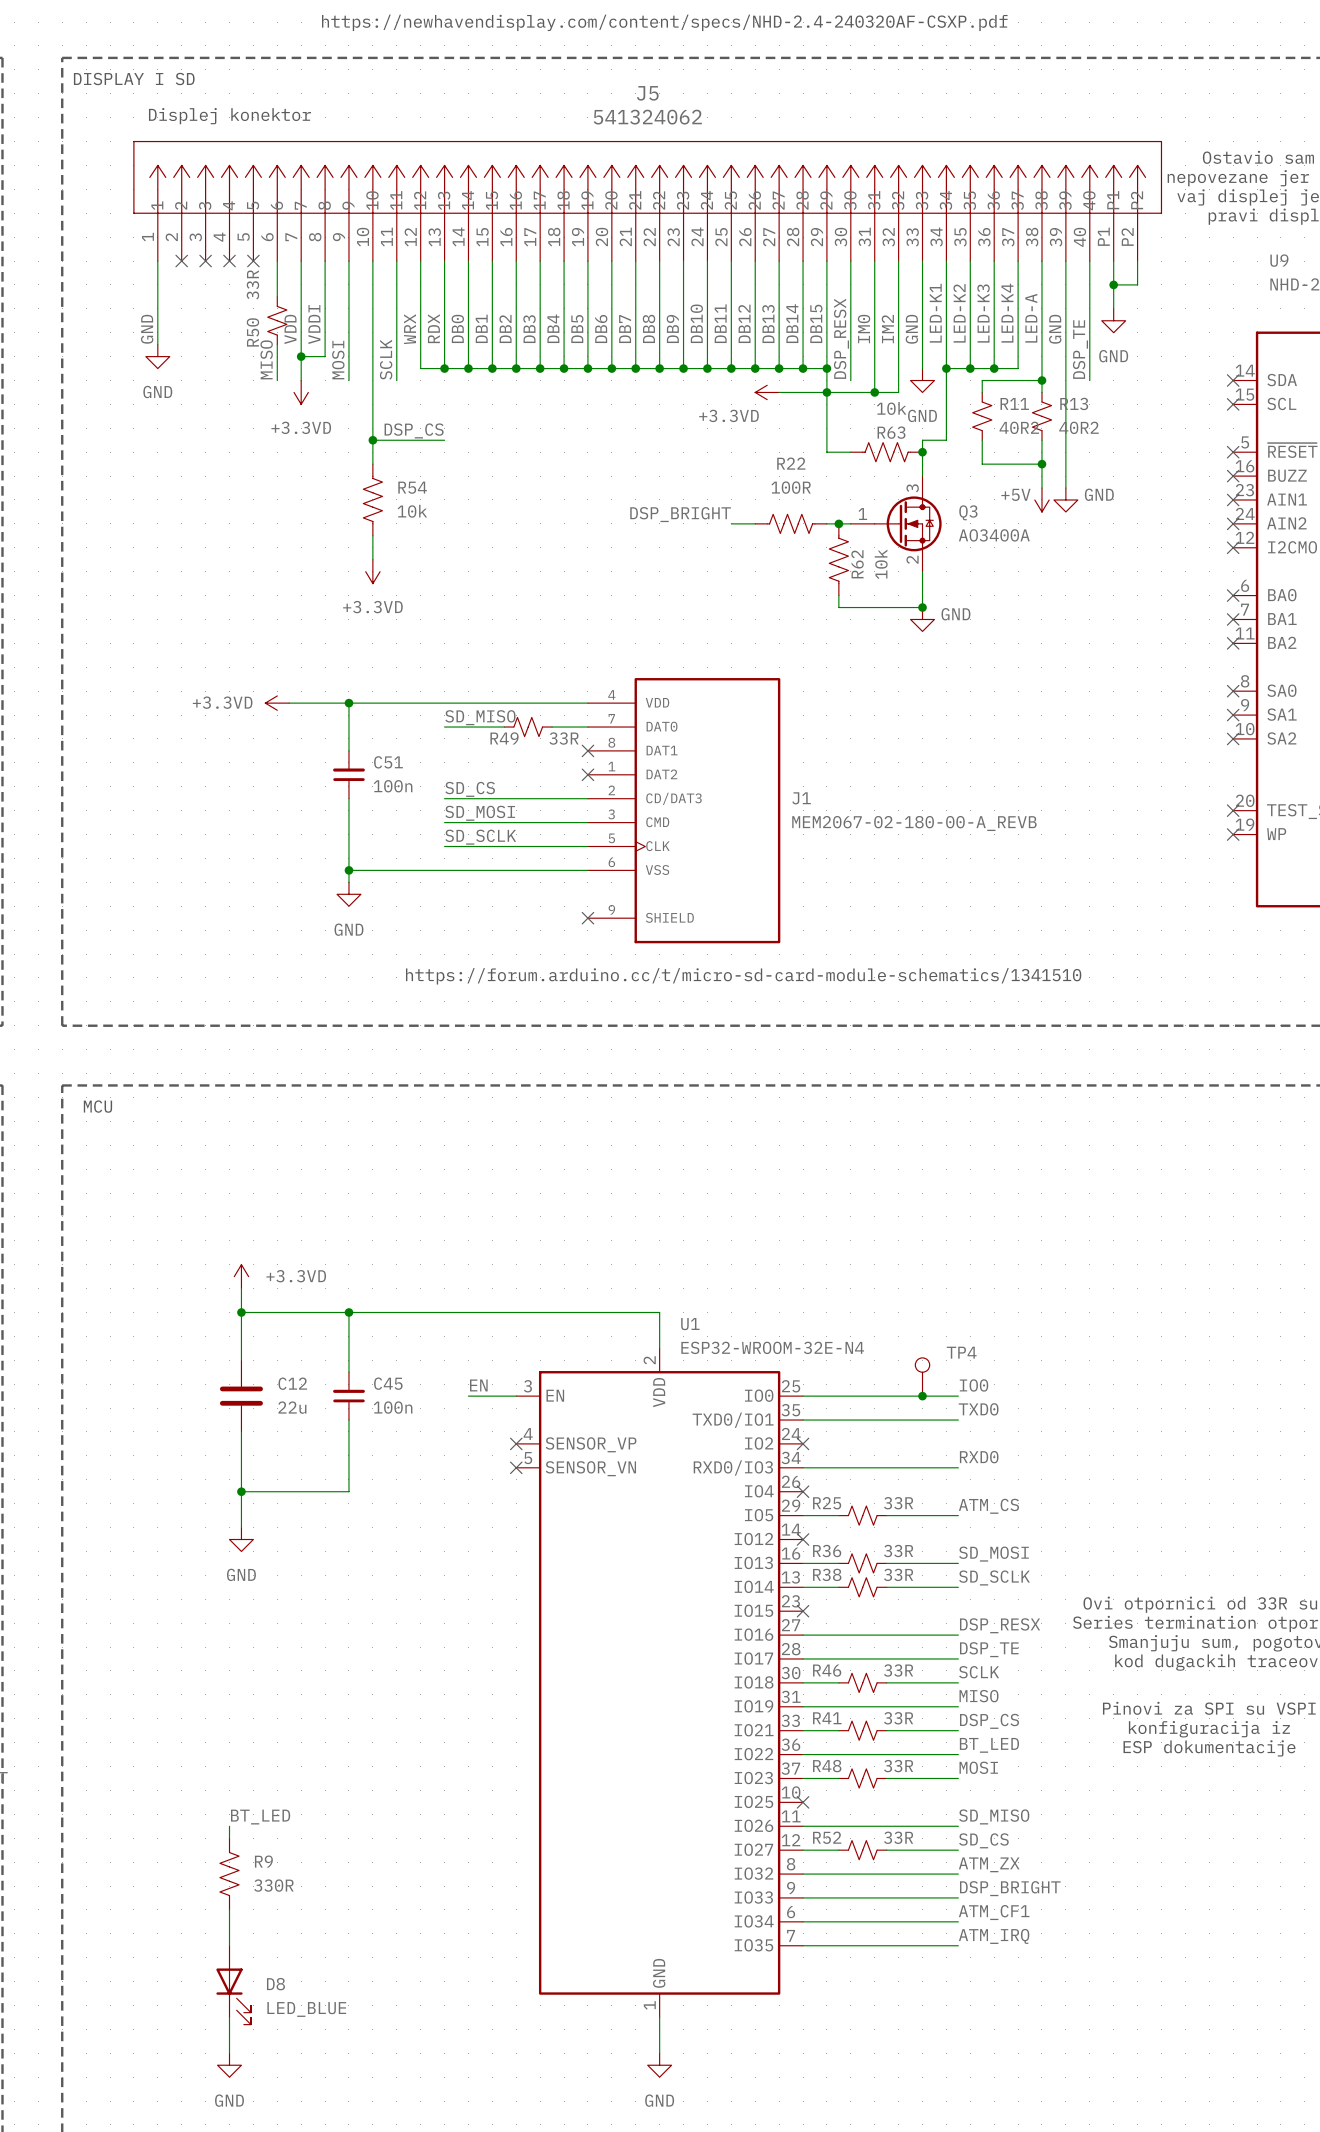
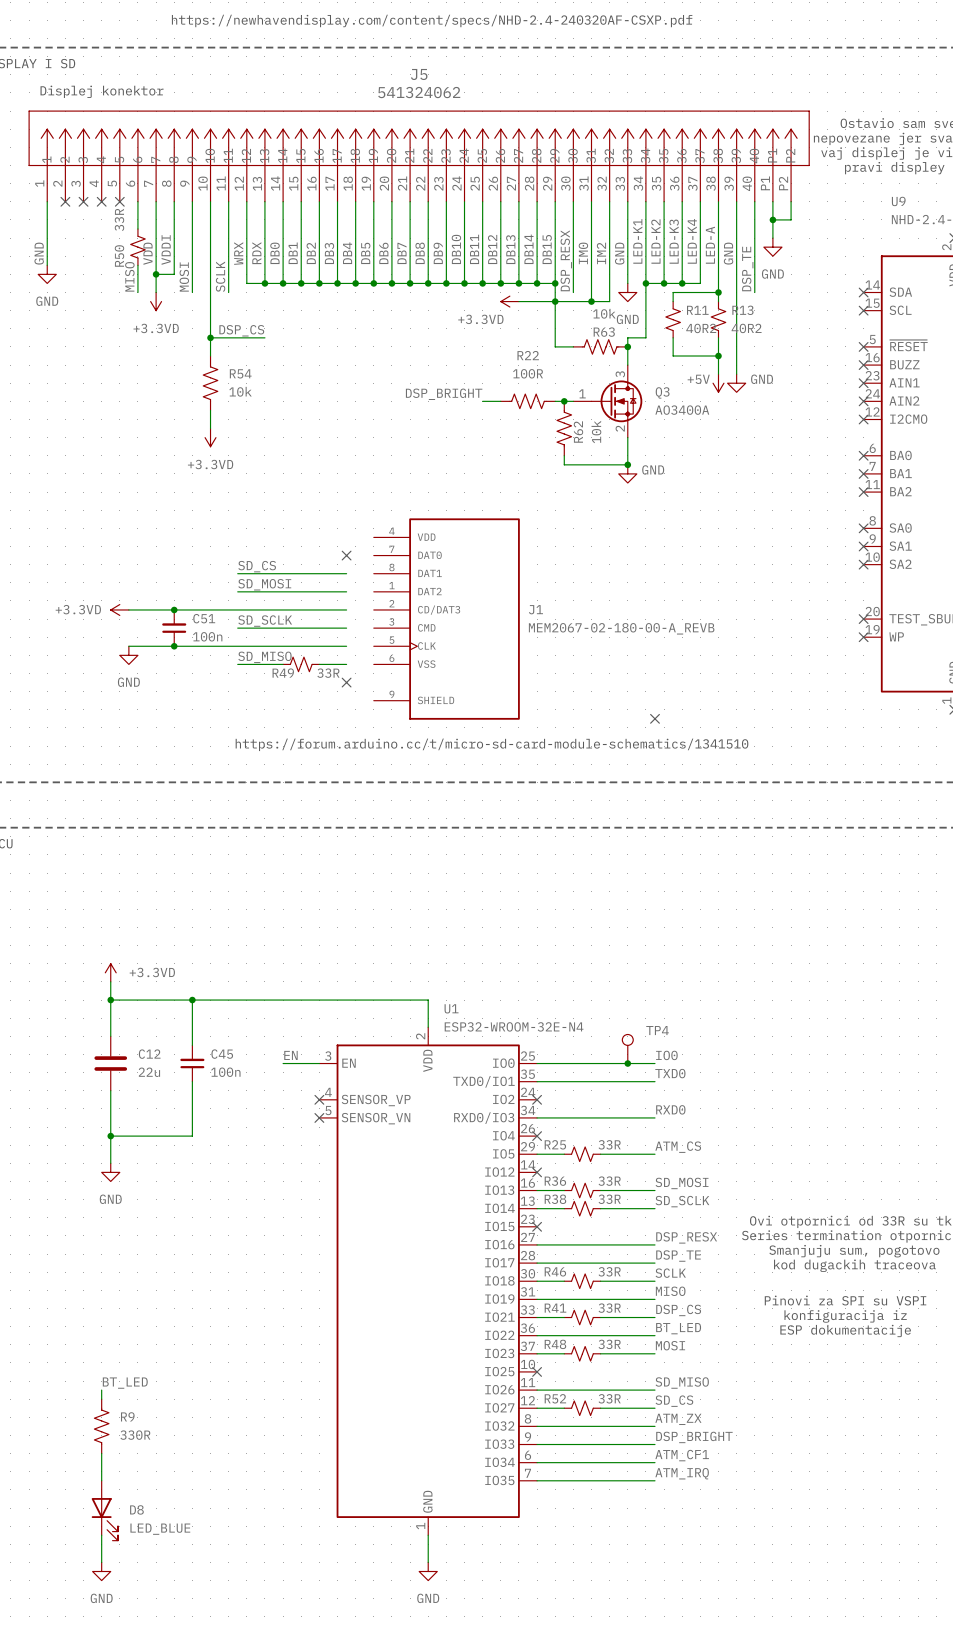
power symbol position: +3.3VD (277, 703) -> +3.3VD (119, 609)
wire: (289, 703) (587, 703) -> none
wire: (348, 703) (348, 750) -> none
junction: (348, 703) -> none
label position: SD_MISO (480, 717) -> SD_MISO (264, 657)
wire: (444, 727) (504, 727) -> none
R49 position: (528, 727) -> (301, 664)
wire: (552, 727) (587, 727) -> none
no-connect mark: none -> (346, 555)
wire: none -> (237, 573) (346, 573)
no-connect mark: (587, 750) -> none
C51 position: (348, 774) -> (174, 628)
wire: none -> (237, 591) (346, 591)
no-connect mark: (587, 774) -> none
label position: SD_CS (470, 789) -> SD_CS (257, 566)
wire: none -> (128, 609) (264, 609)
junction: none -> (174, 609)
wire: (348, 798) (348, 882) -> none
wire: (552, 798) (587, 798) -> none
label position: SD_MOSI (480, 813) -> SD_MOSI (264, 584)
wire: (552, 822) (587, 822) -> (237, 628) (264, 628)
label position: SD_SCLK (480, 837) -> SD_SCLK (265, 621)
wire: none -> (128, 646) (264, 646)
wire: (552, 846) (587, 846) -> none
wire: (348, 870) (408, 870) -> none
junction position: (348, 870) -> (174, 646)
wire: (552, 870) (587, 870) -> none
power symbol position: GND (348, 894) -> GND (128, 655)
no-connect mark position: (587, 918) -> (346, 682)
no-connect mark: none -> (655, 718)

